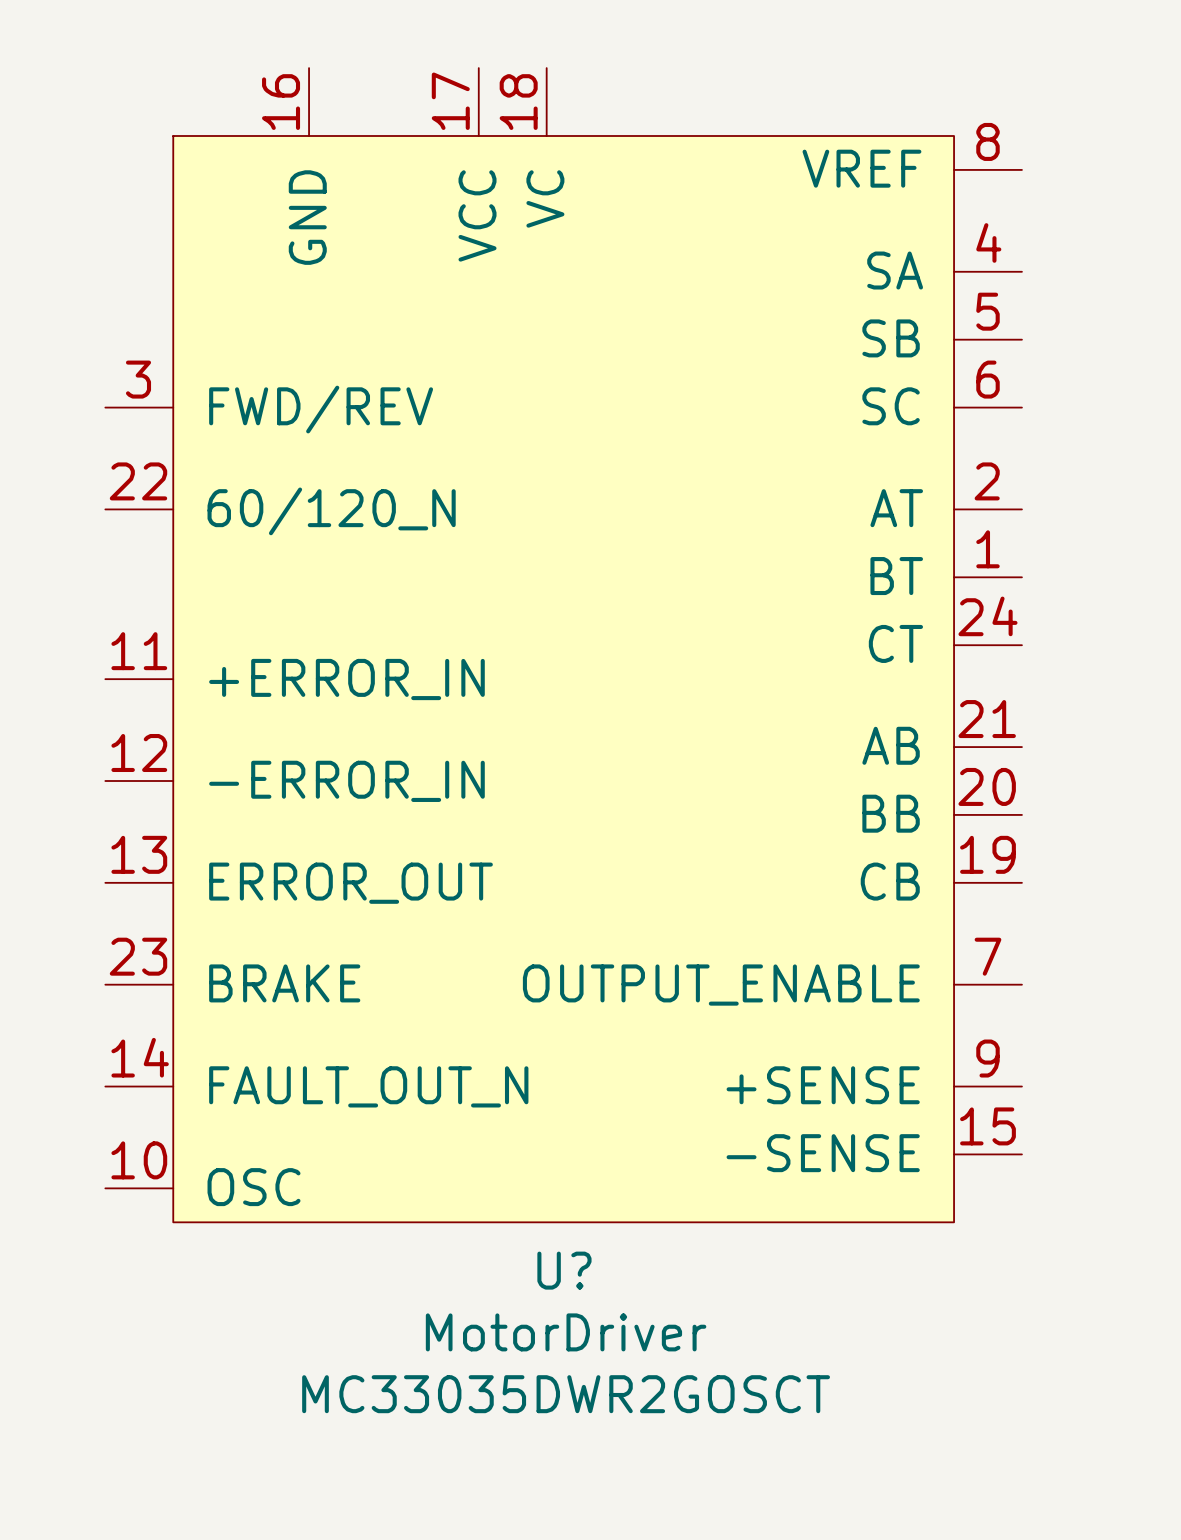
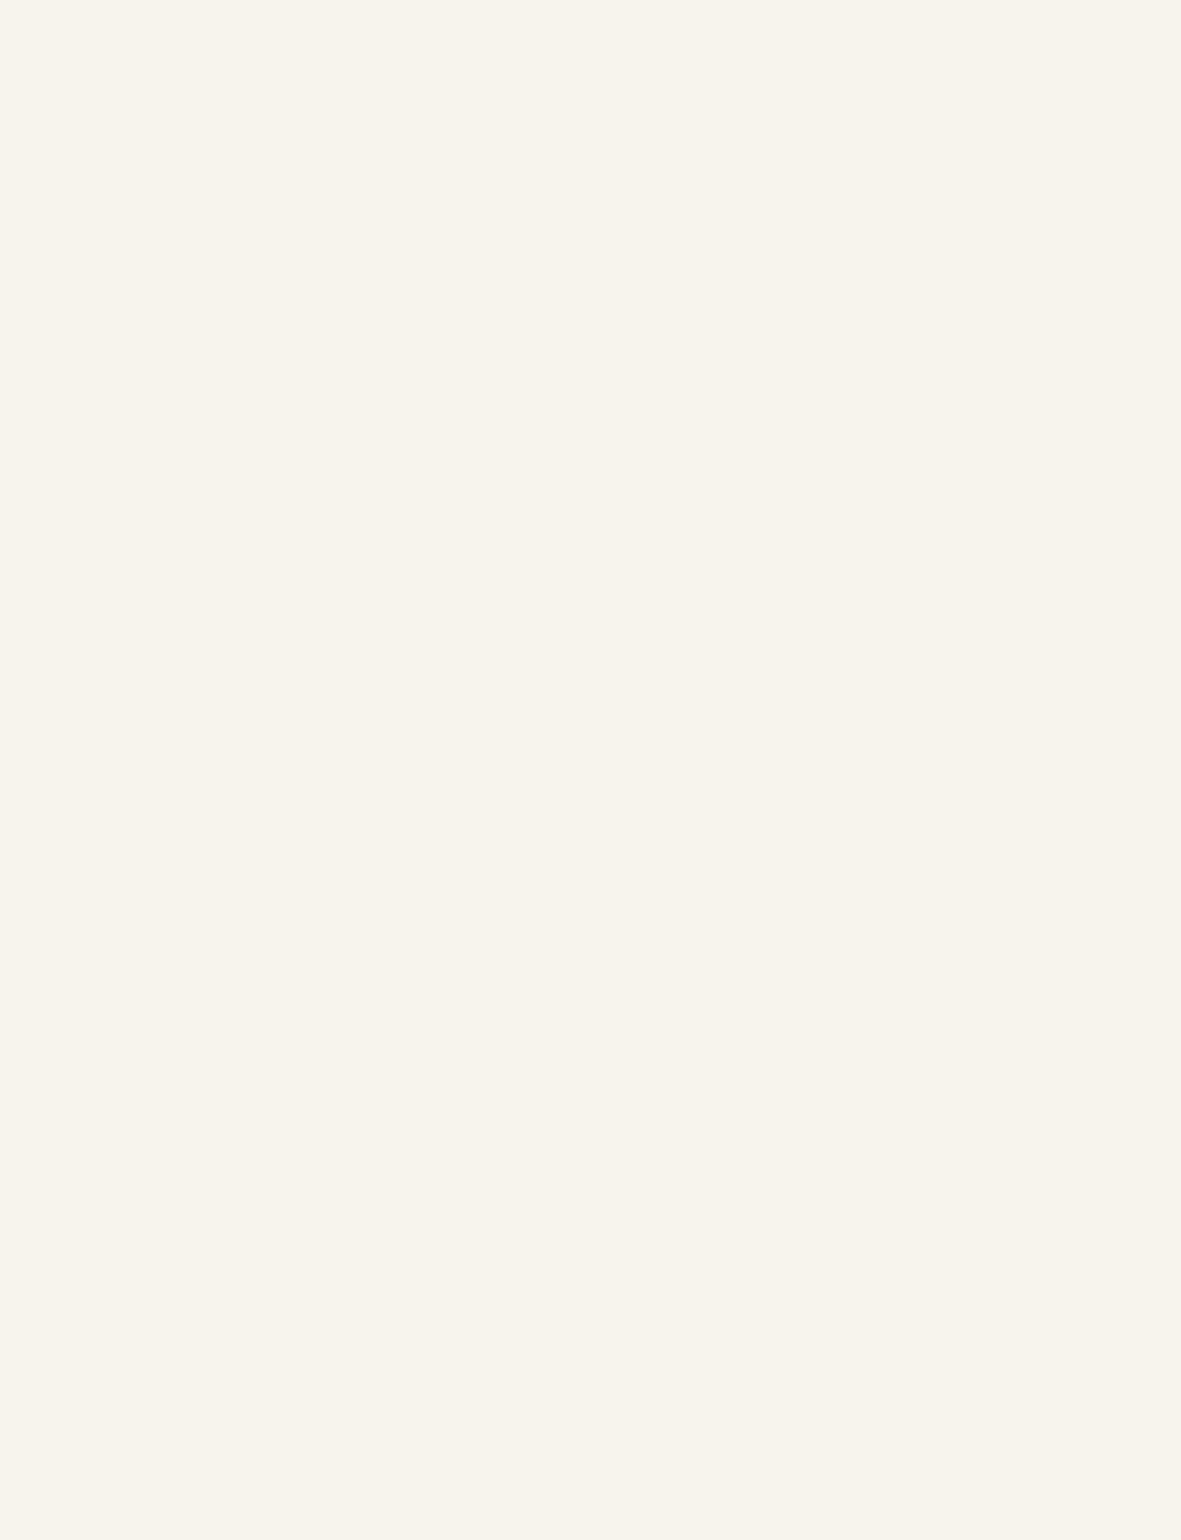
U?: MotorDriver (563, 645) -> none

